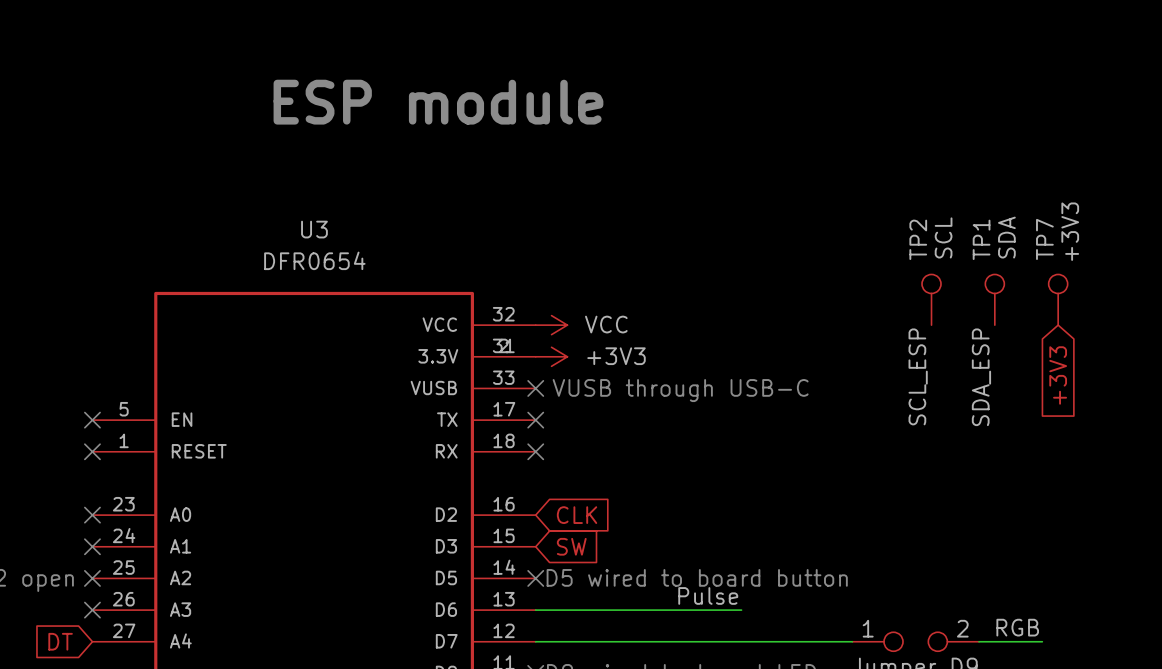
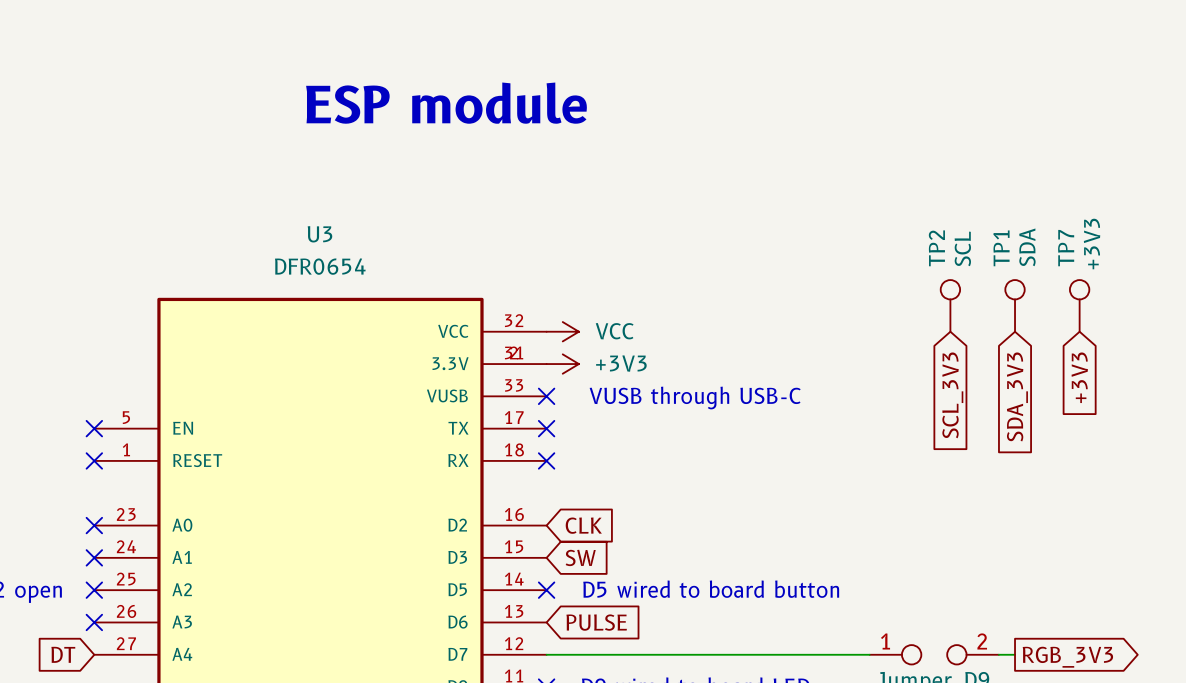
label: SCL_ESP (918, 376) -> none
label: SDA_ESP (981, 377) -> none
global label: none -> SCL_3V3 (952, 395)
global label: none -> SDA_3V3 (1017, 396)
label: Pulse (708, 595) -> none
wire: (535, 610) (741, 610) -> none
global label: none -> PULSE (596, 622)
label: RGB (1017, 627) -> none
wire: (994, 641) (1042, 641) -> none
global label: none -> RGB_3V3 (1067, 657)

